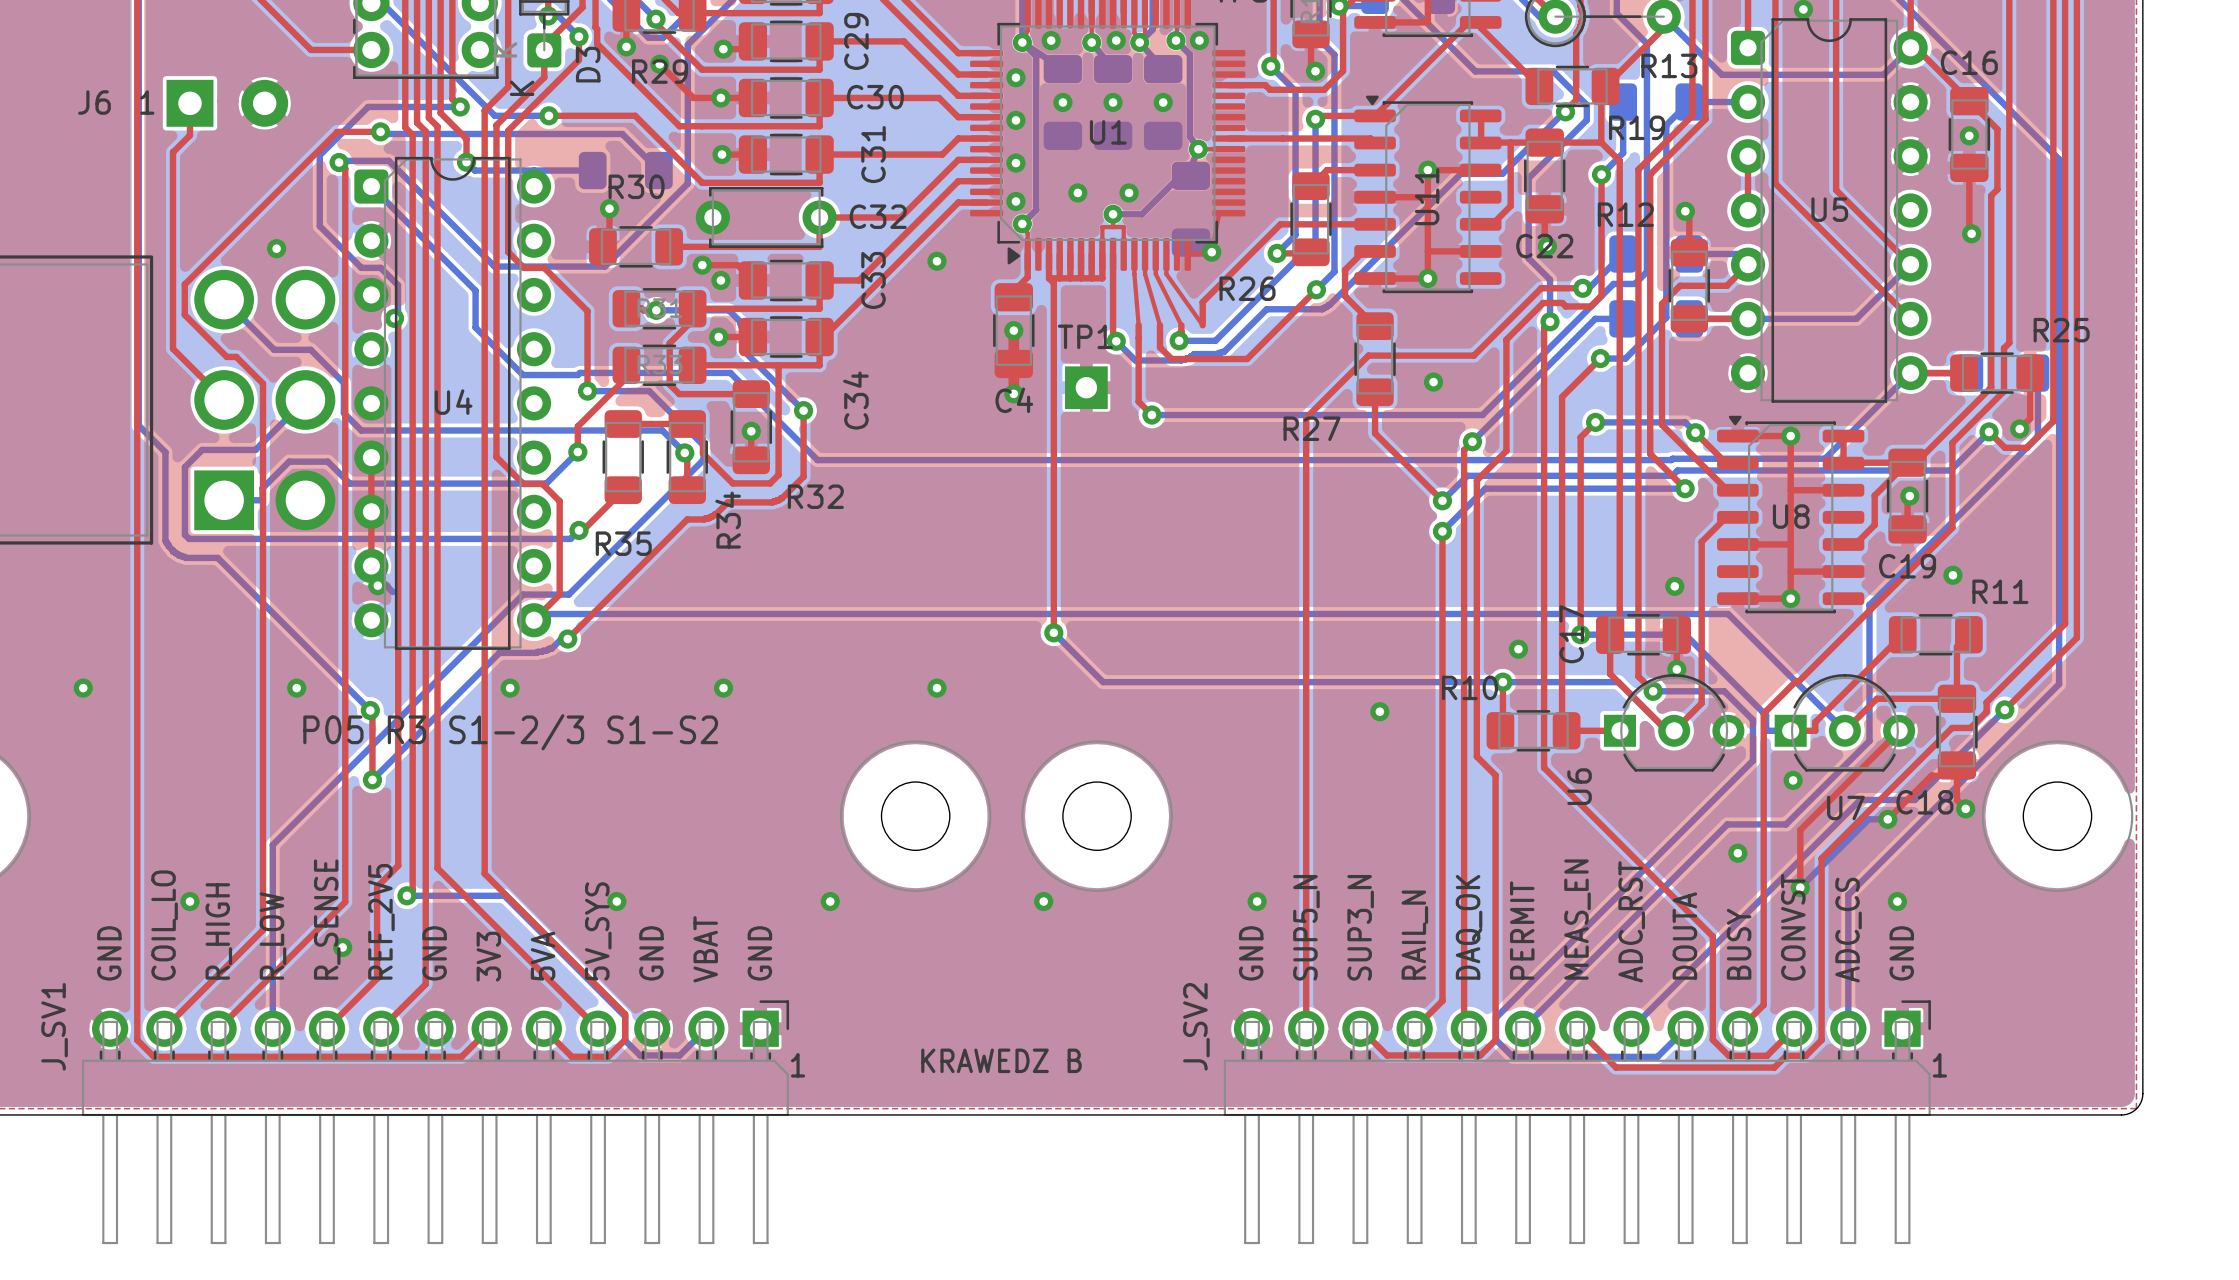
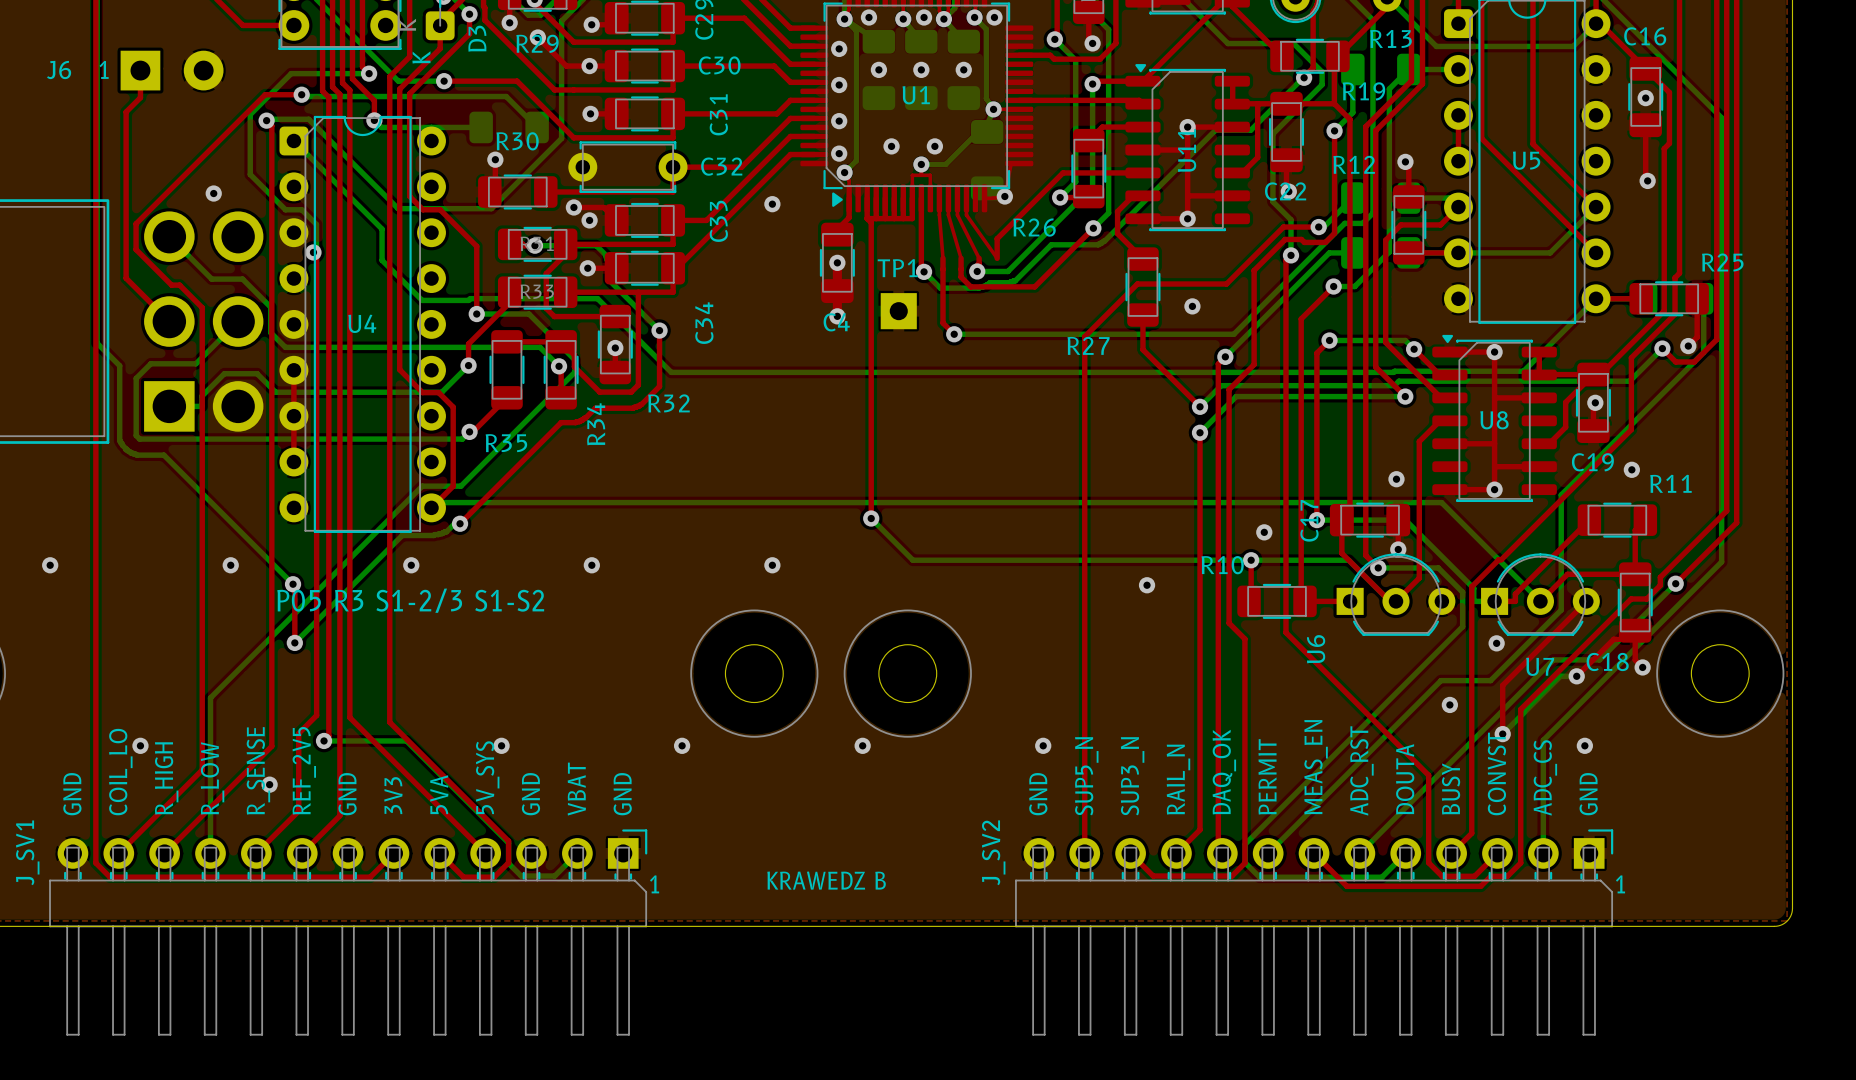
bottom track: (377, 585) (386, 585) (392, 592) -> none
via: (377, 585) -> none

